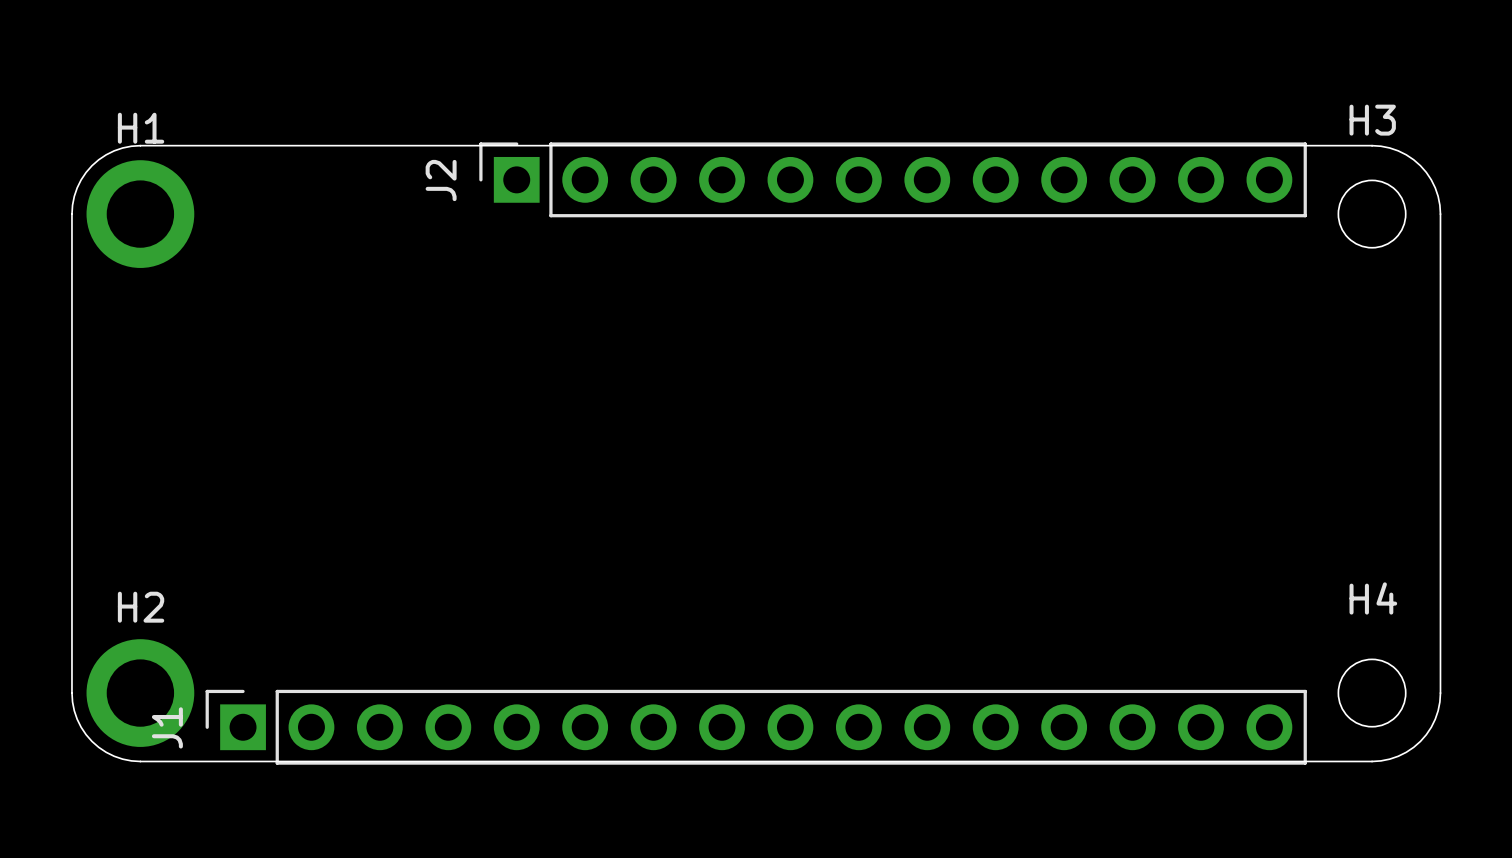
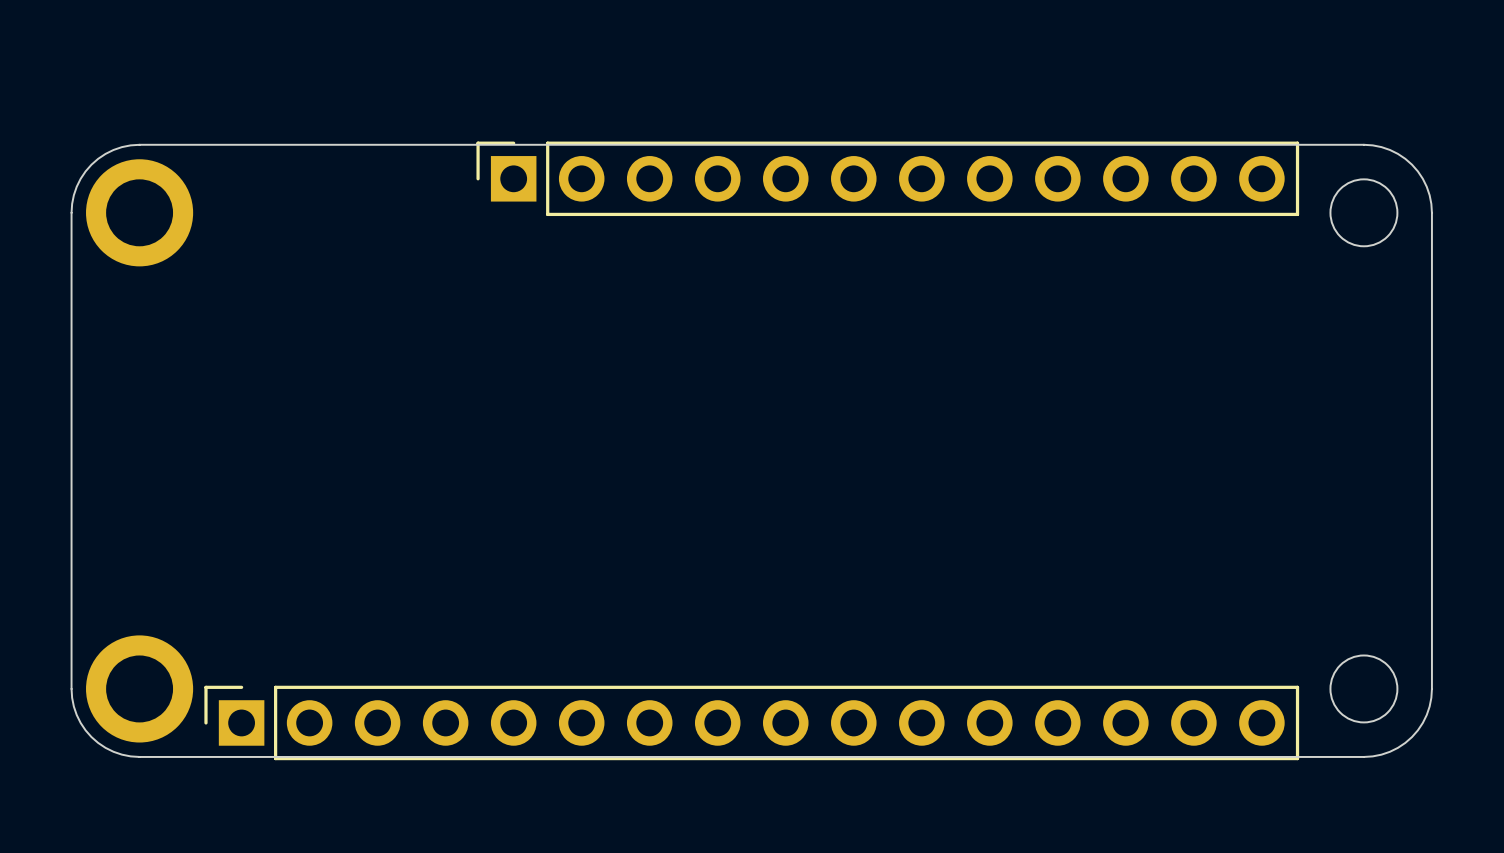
H3 name: H3 (1372, 120) -> none
H1 name: H1 (141, 128) -> none
J2 name: J2 (441, 180) -> none
H4 name: H4 (1373, 598) -> none
H2 name: H2 (141, 607) -> none
J1 name: J1 (167, 727) -> none

